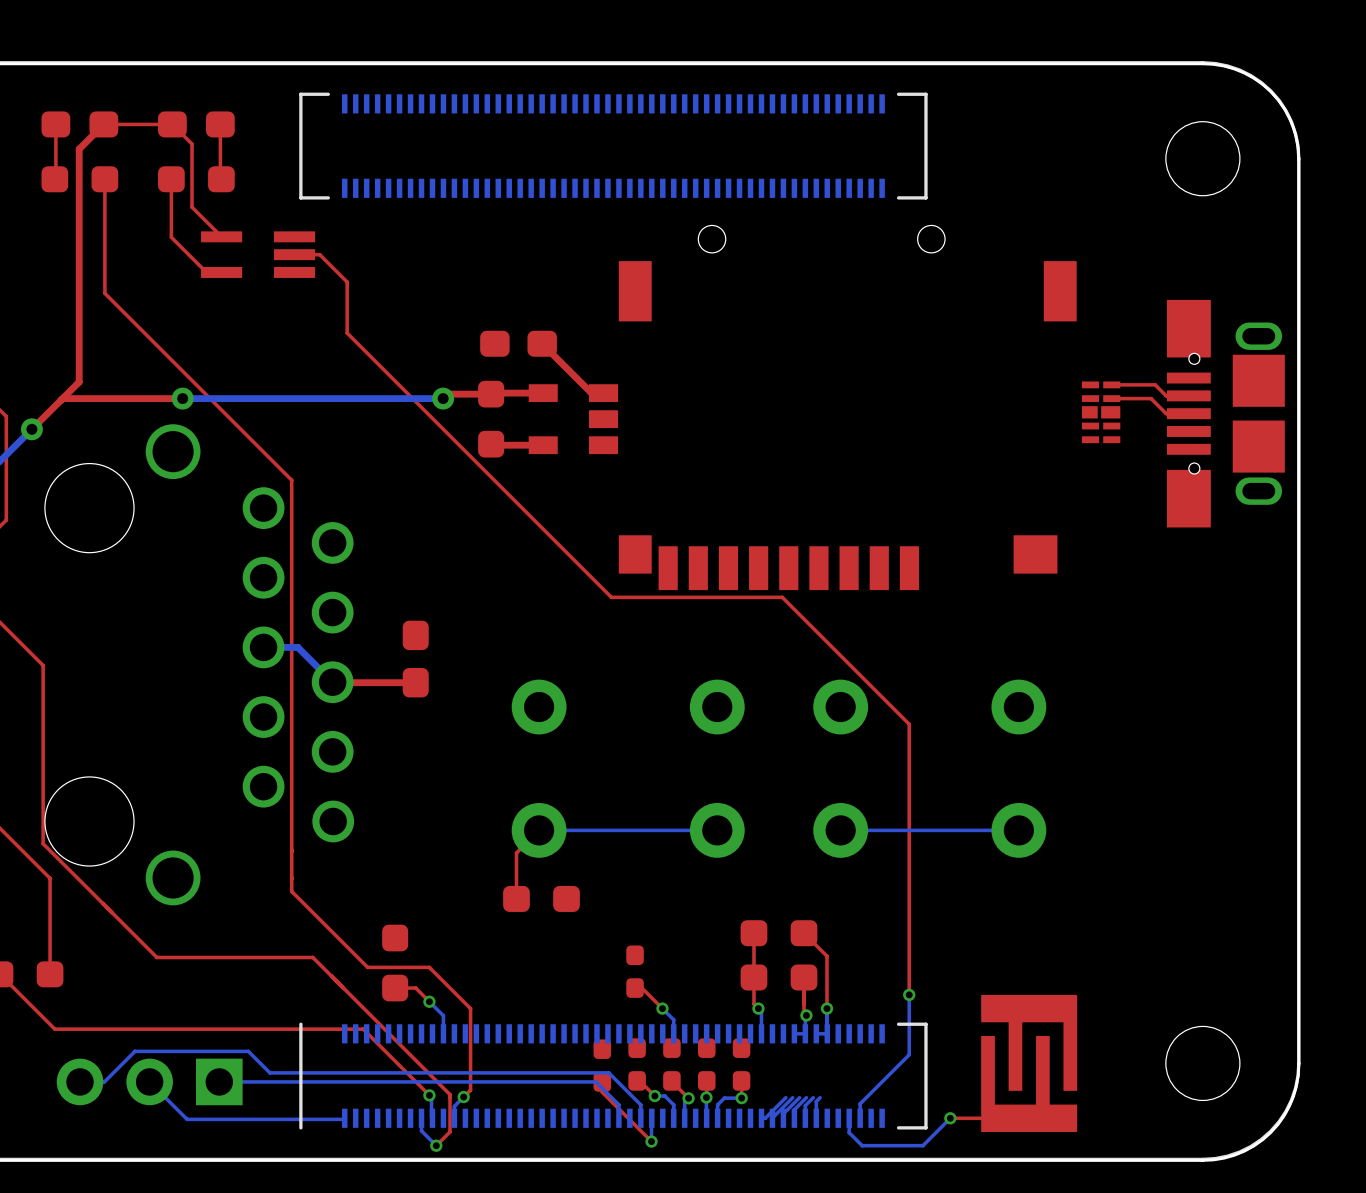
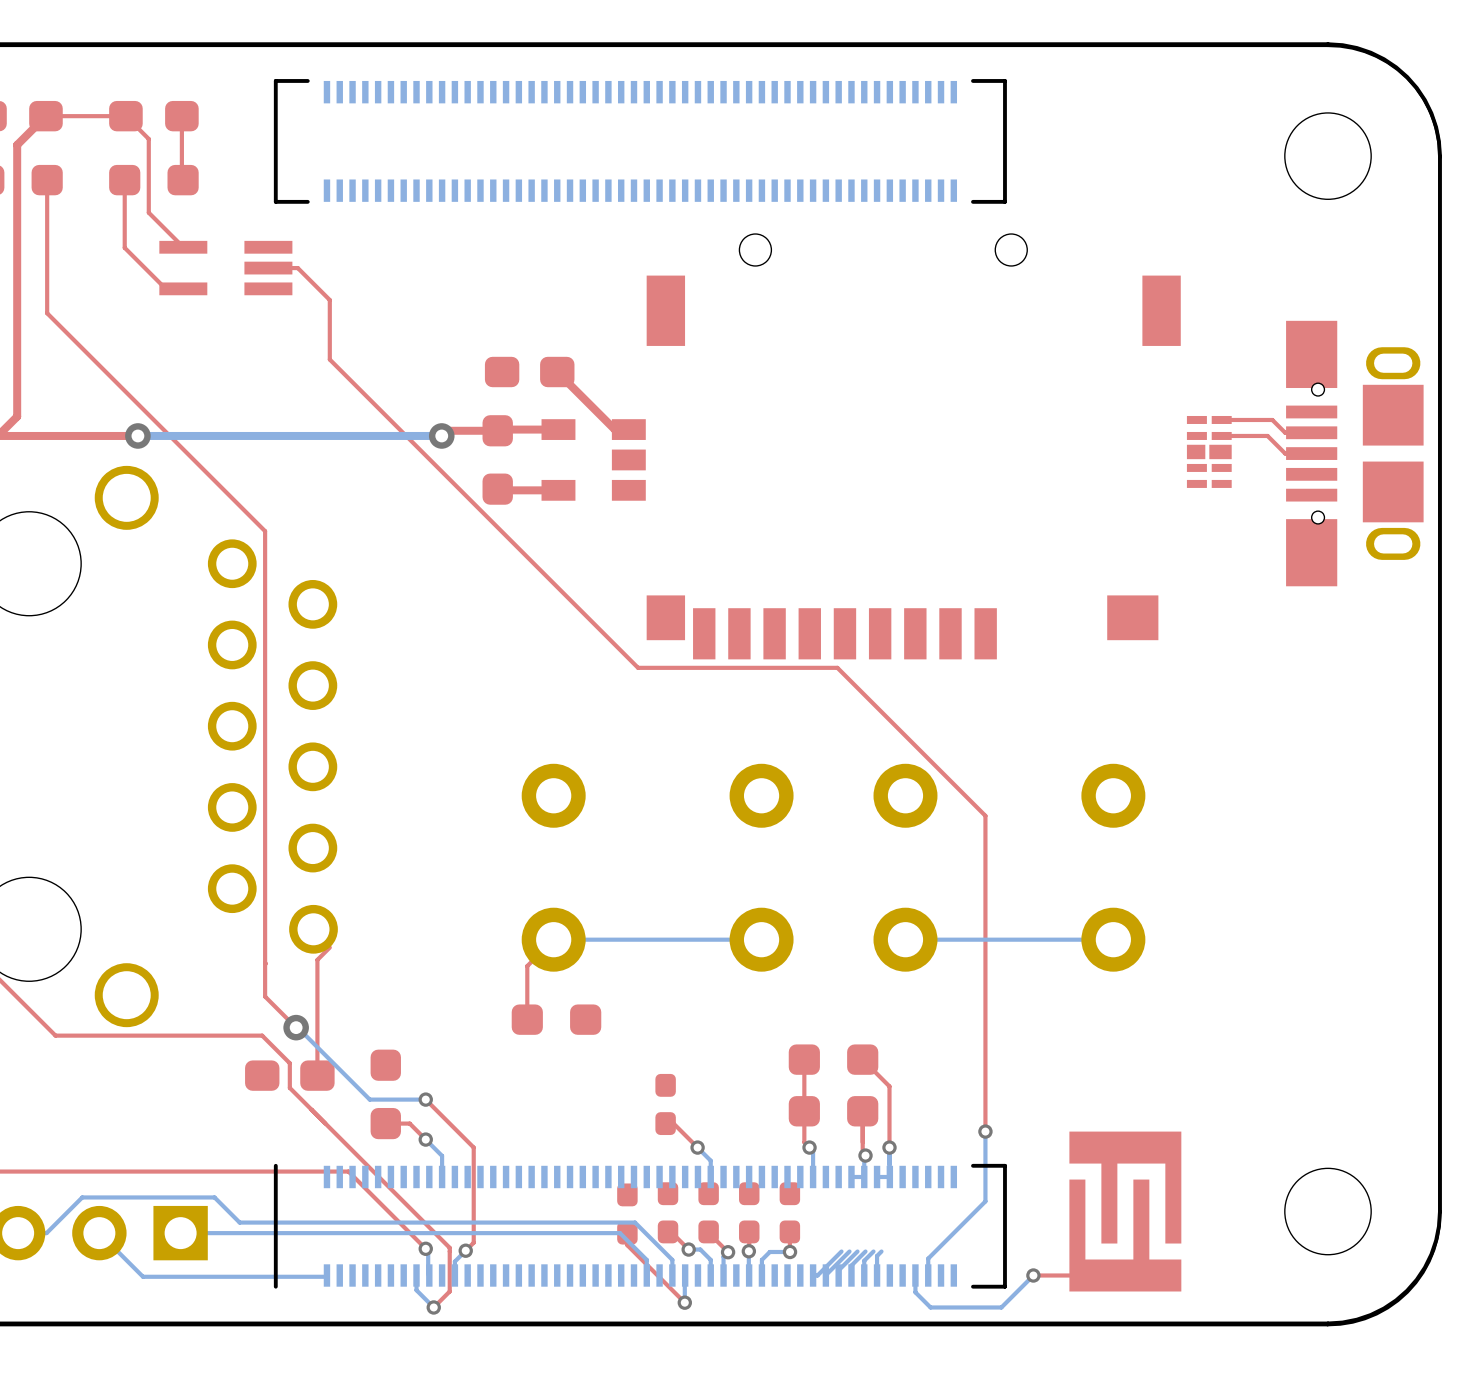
bottom track: (263, 647) (297, 647) (332, 682) -> none
part rotation: 0° (415, 659) -> 90° clockwise (289, 1075)
part position: (415, 659) -> (289, 1075)
top track: (332, 682) (415, 682) -> none
top track: none -> (329, 947) (317, 959) (317, 1075)
top track: (291, 879) (291, 891) (367, 967) (429, 967) -> (265, 996) (296, 1027)
bottom track: none -> (296, 1027) (369, 1099) (425, 1099)
via: none -> (296, 1027)
top track: (112, 912) (156, 957) (312, 957) -> (55, 1035) (262, 1035) (289, 1063) (289, 1087)
via: none -> (425, 1099)

